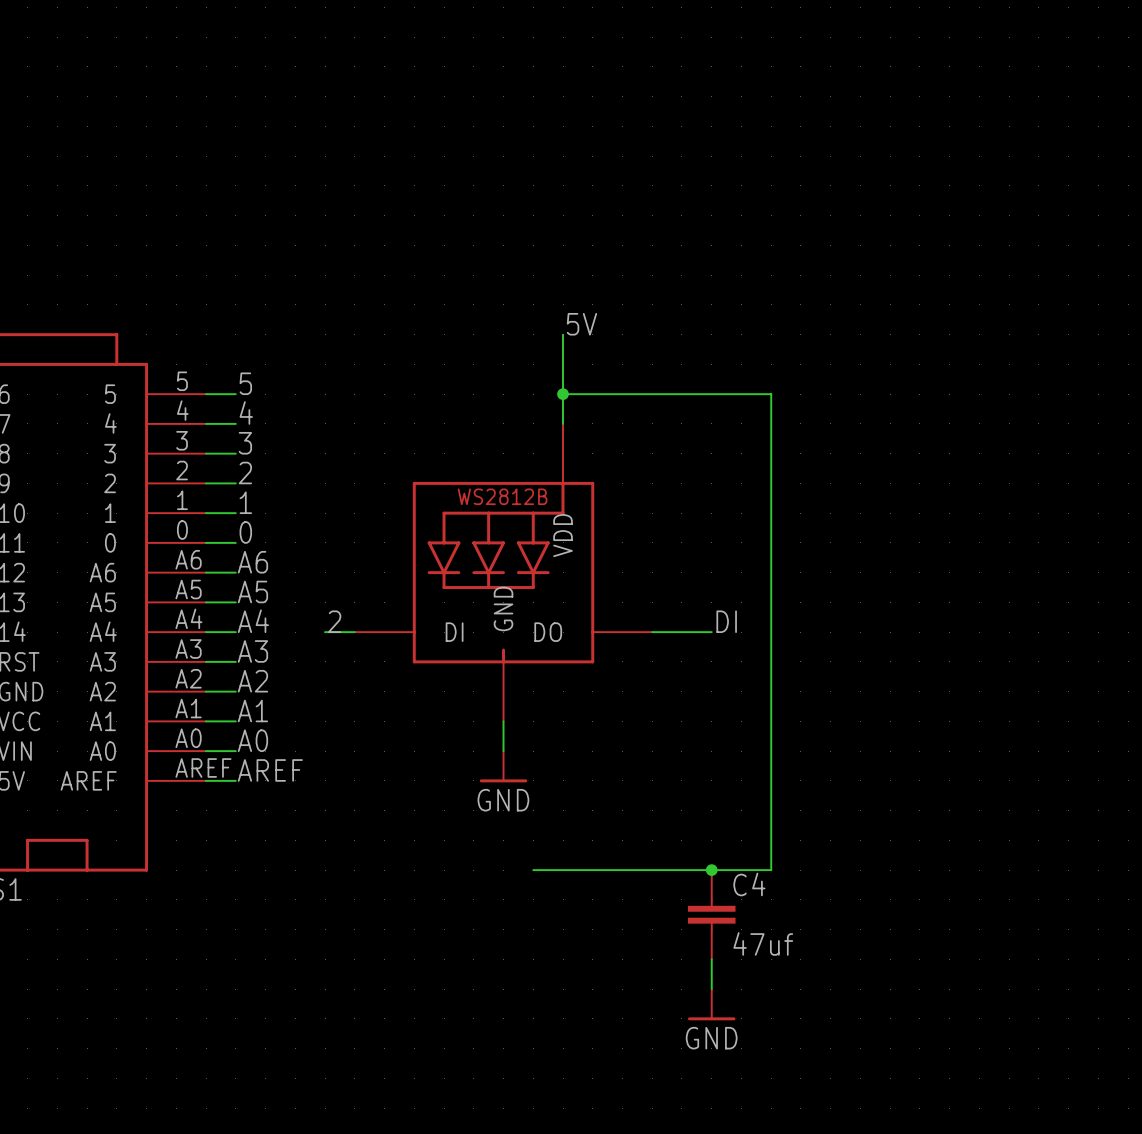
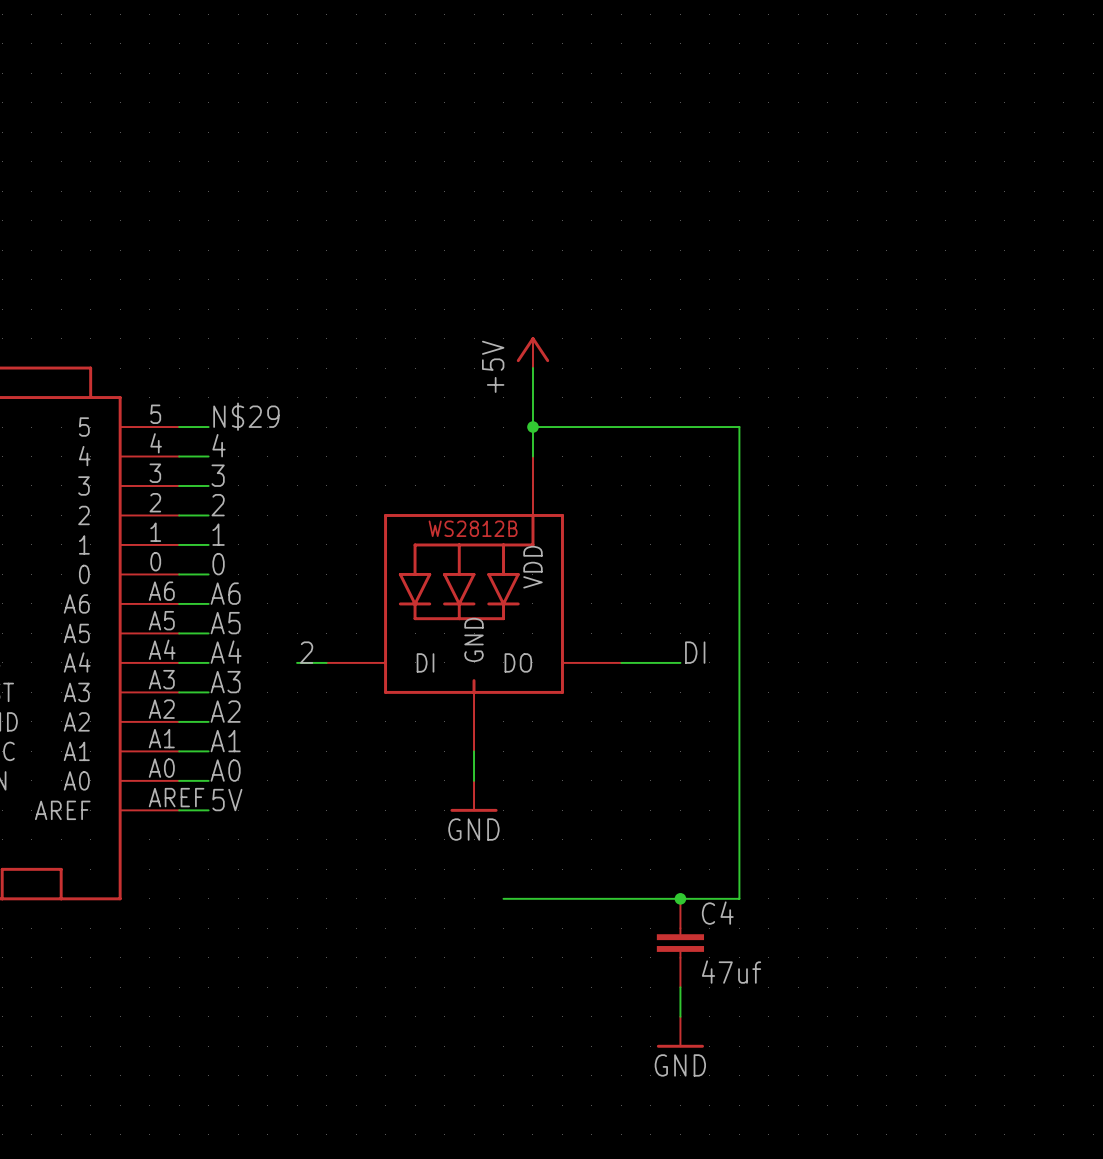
power symbol: none -> +5V (532, 352)
label: 5V (581, 324) -> none
label: 5 (245, 383) -> N$29 (246, 416)
label: AREF (270, 770) -> 5V (227, 800)

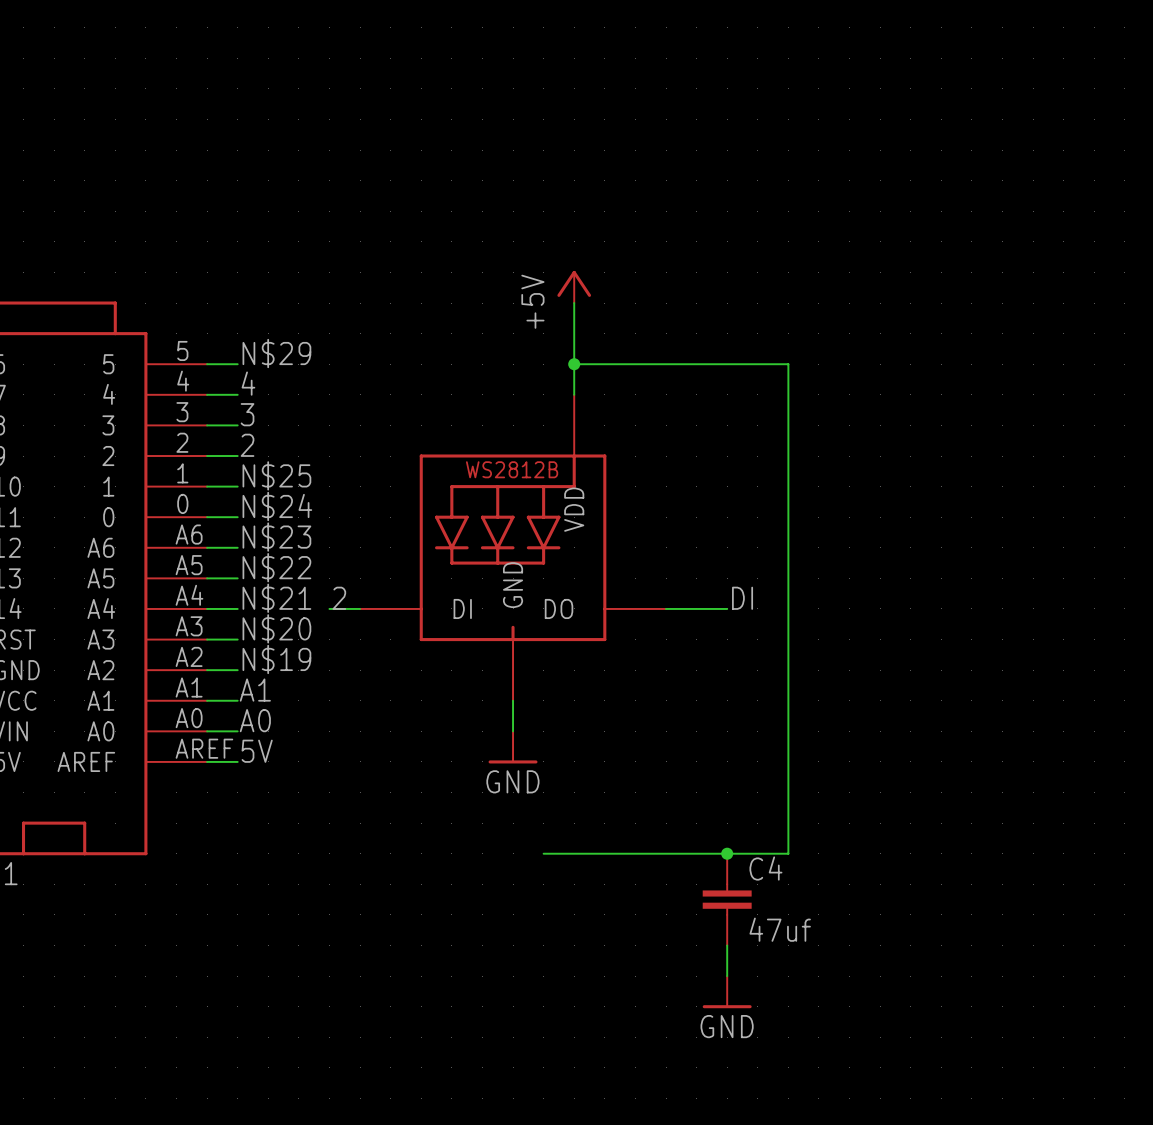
label: 1 (218, 534) -> N$25 (276, 475)
label: 0 (218, 564) -> N$24 (277, 506)
label: A6 (225, 593) -> N$23 (276, 537)
label: A5 (225, 623) -> N$22 (276, 567)
label: A4 (226, 652) -> N$21 (276, 598)
label: A3 (225, 682) -> N$20 (276, 628)
label: A2 (225, 711) -> N$19 (276, 659)

